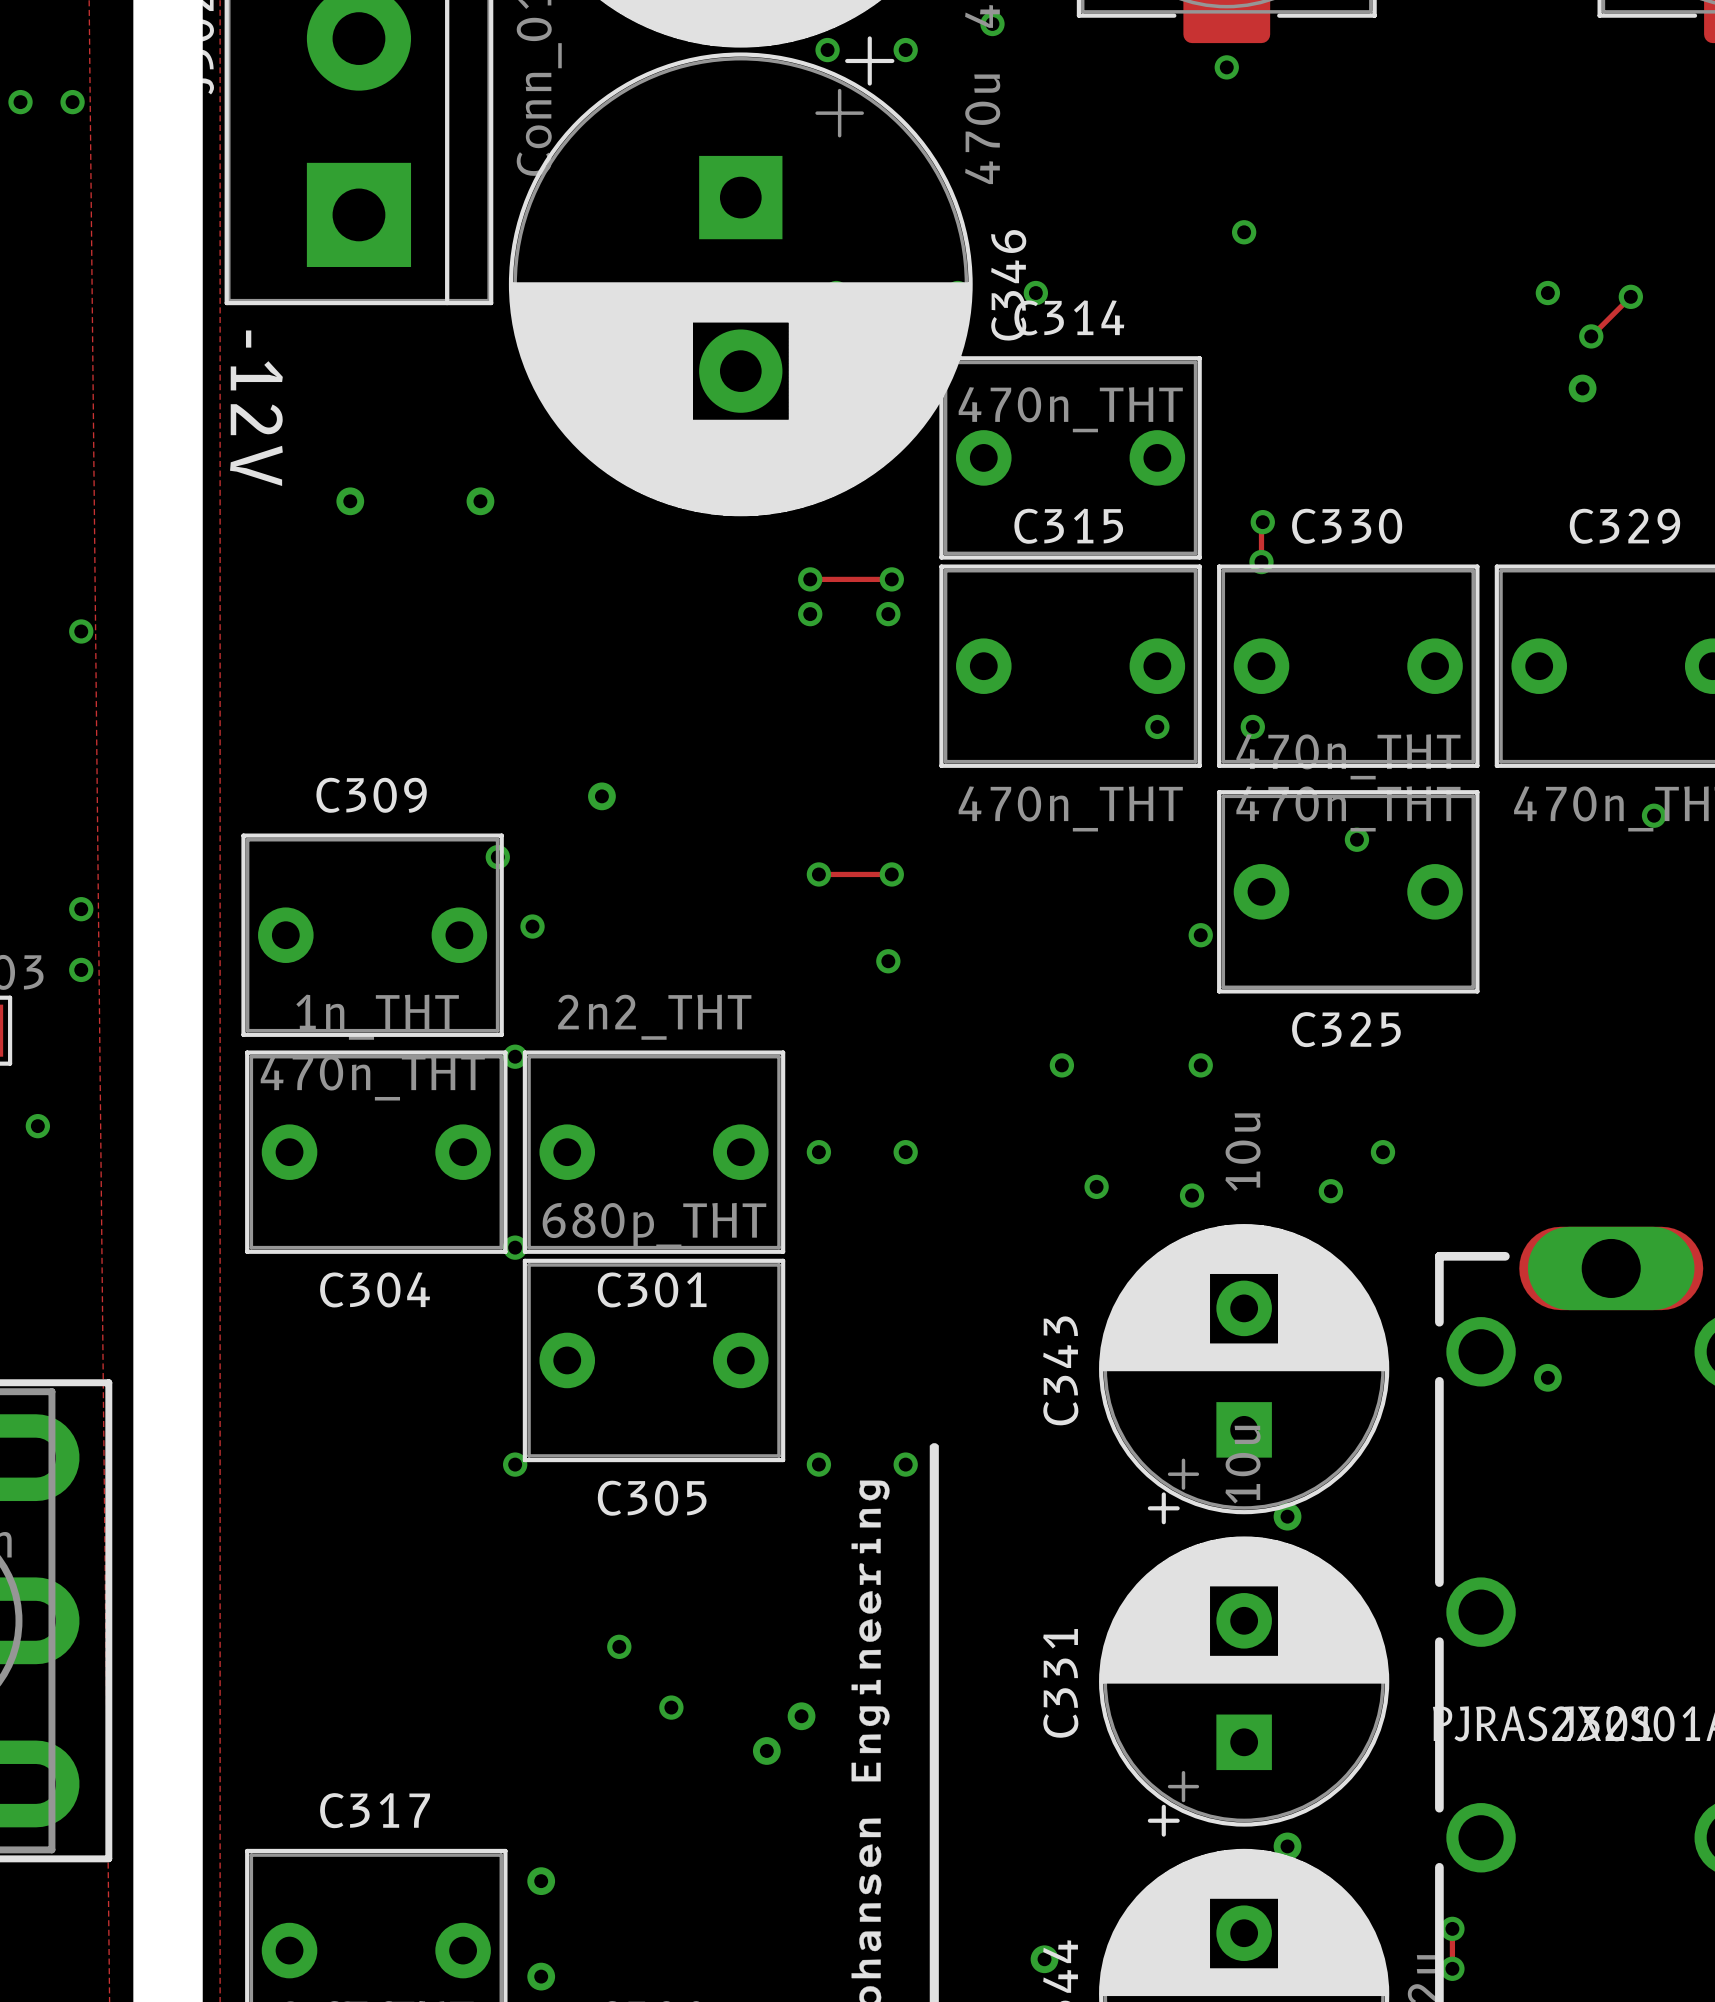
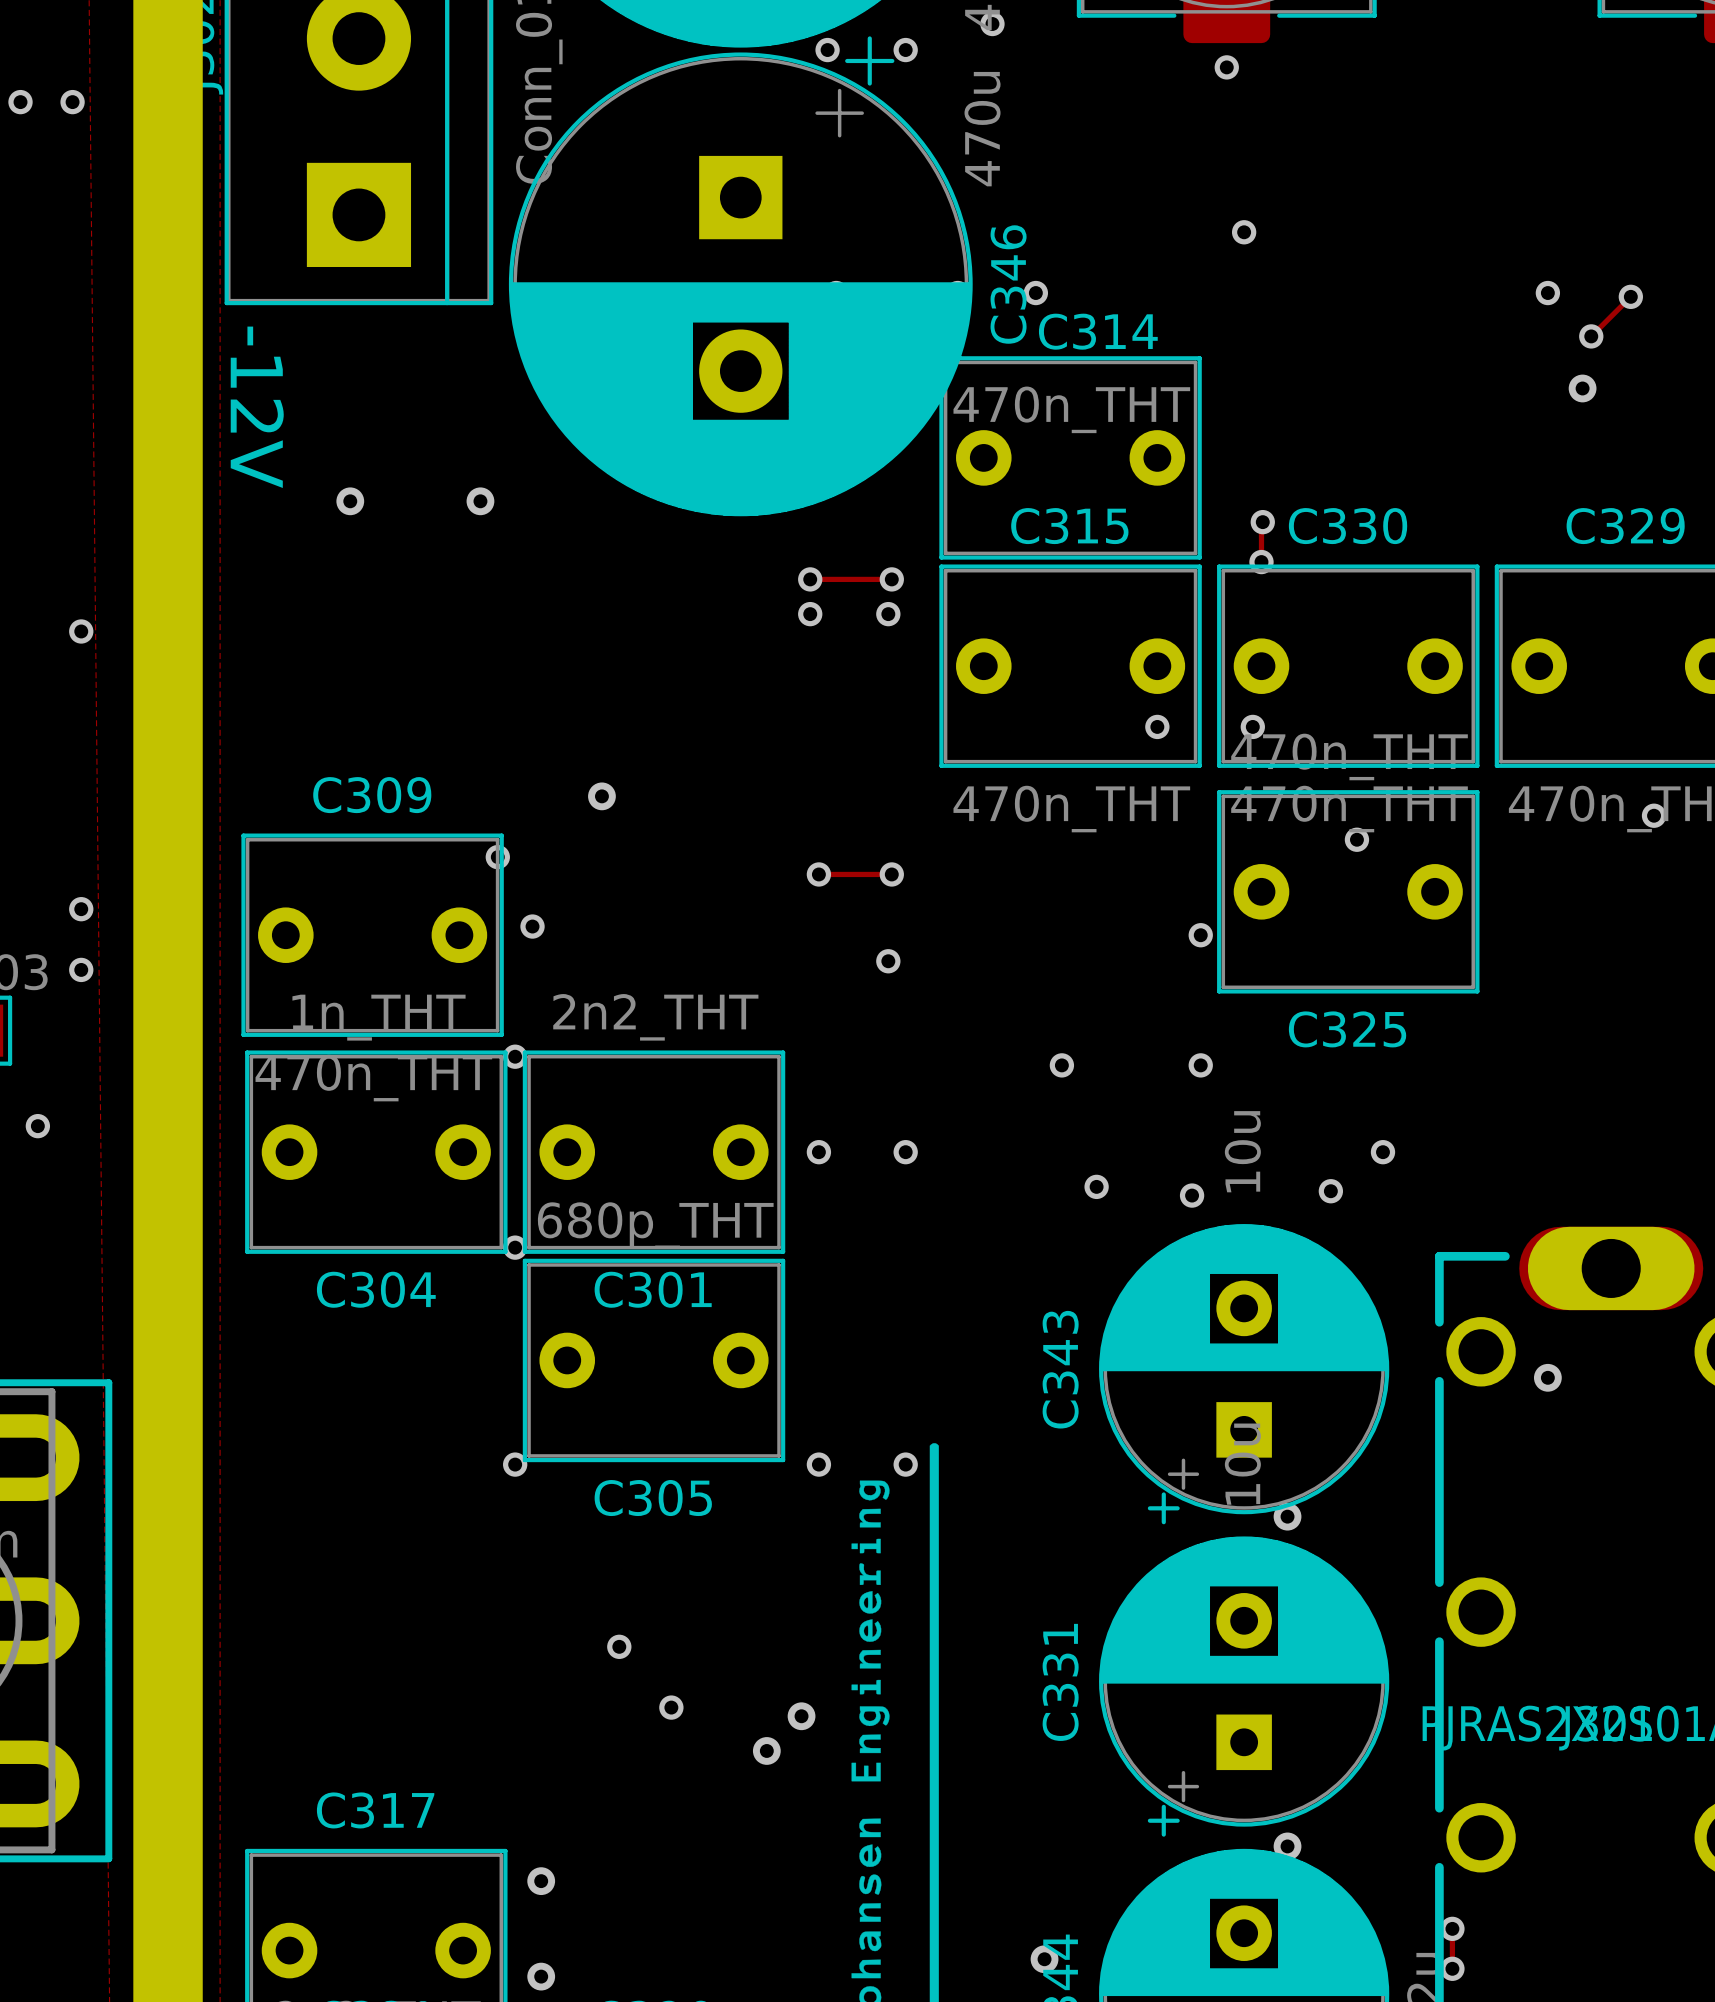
C314 name position: C314 (1069, 317) -> C314 (1098, 331)

